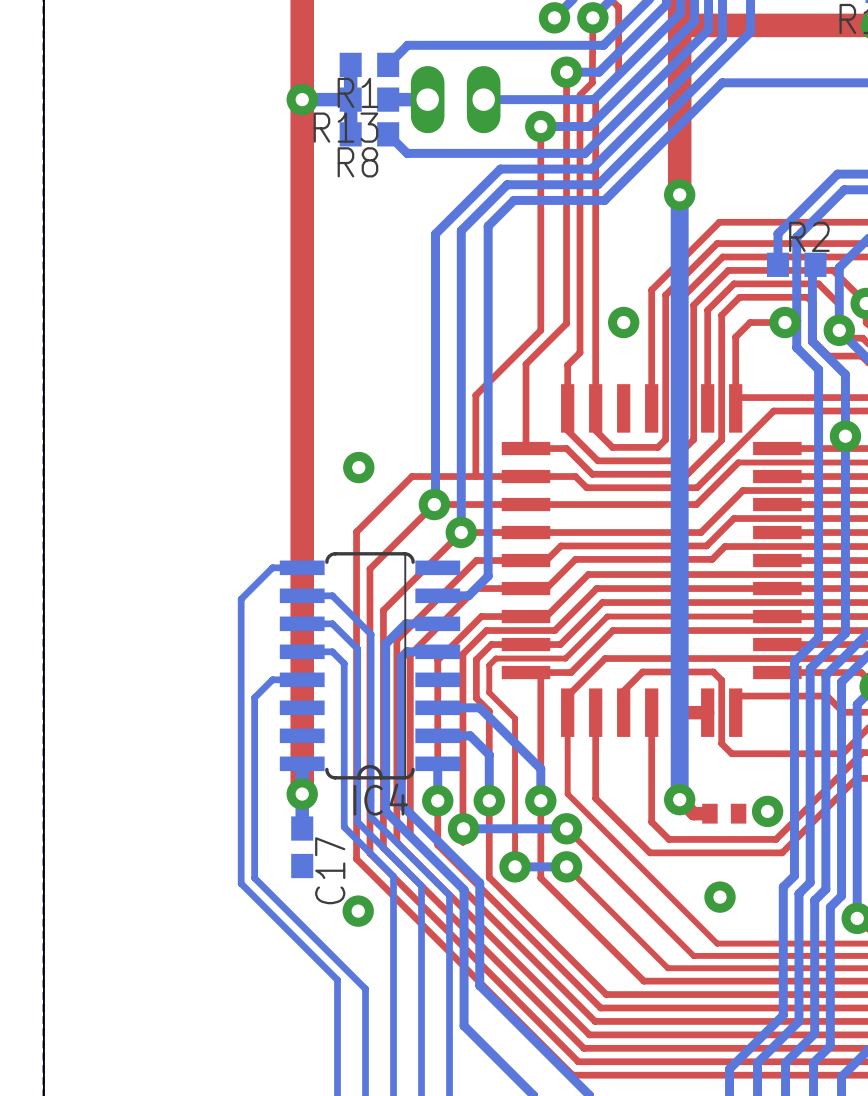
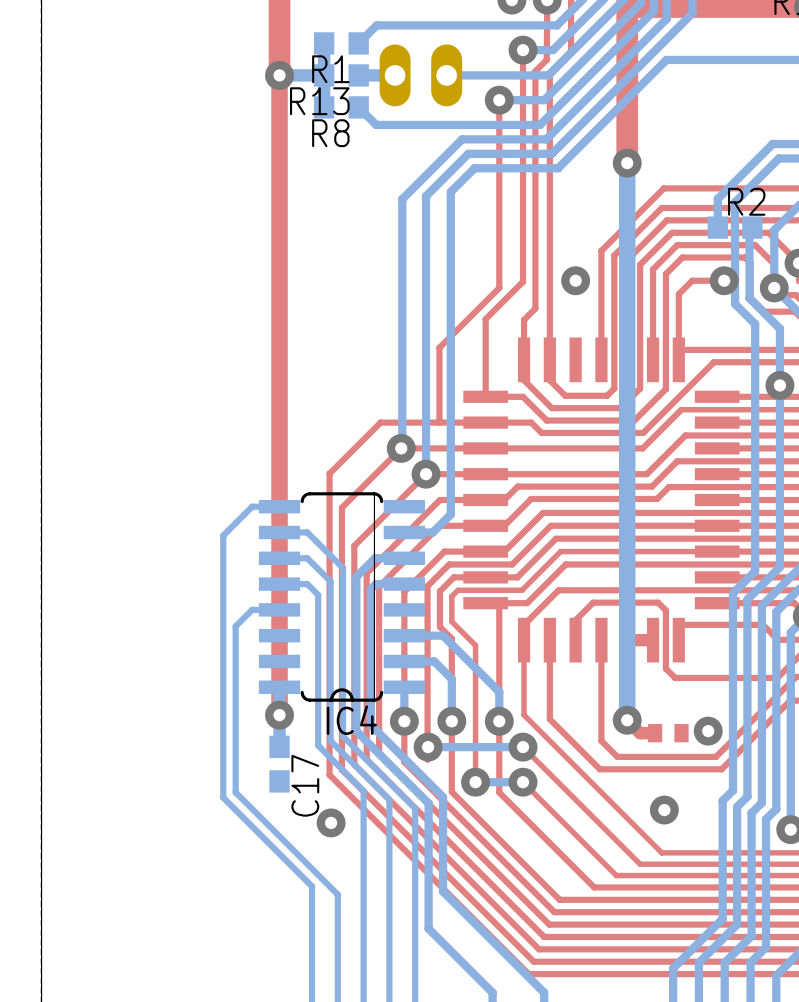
top track width: thick (302, 99) (302, 794) -> thin (279, 75) (279, 715)
via: (358, 467) -> none

